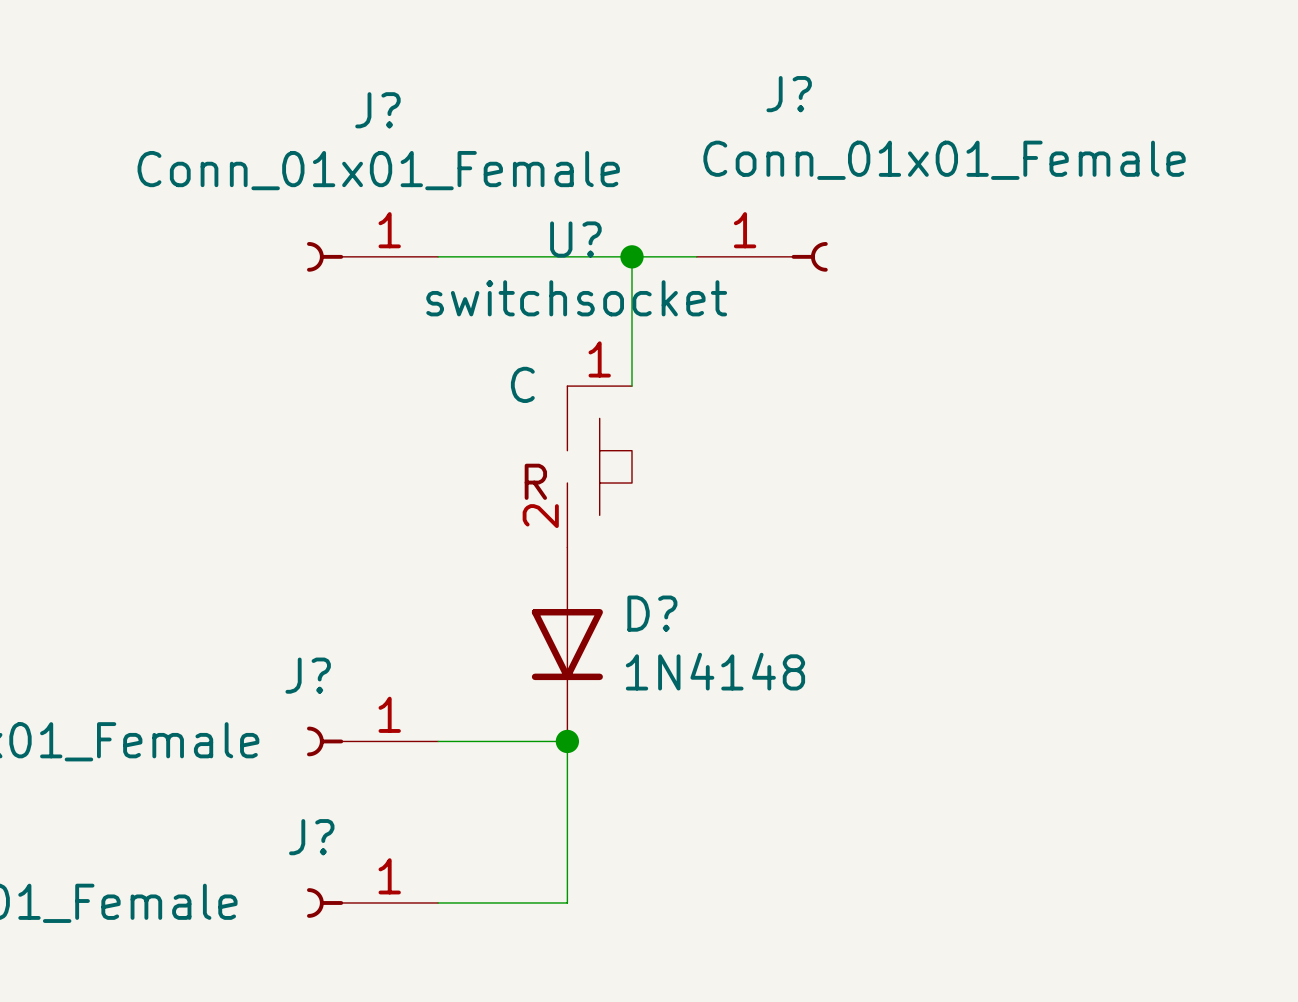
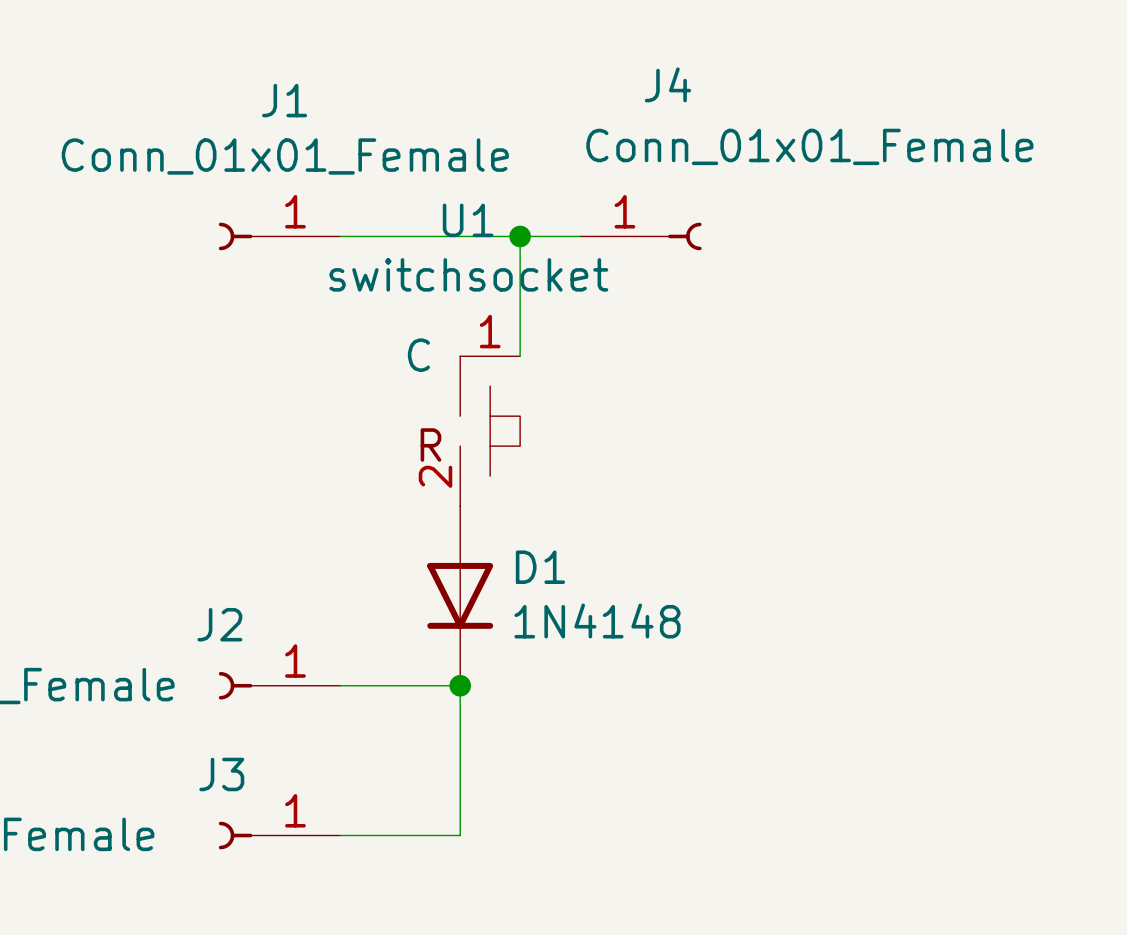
J? name: J? (789, 94) -> J4 (667, 84)
J? name: J? (377, 110) -> J1 (284, 100)
U? name: U? (575, 239) -> U1 (468, 220)
D? name: D? (652, 613) -> D1 (540, 567)
J? name: J? (308, 675) -> J2 (219, 624)
J? name: J? (311, 837) -> J3 (221, 774)

